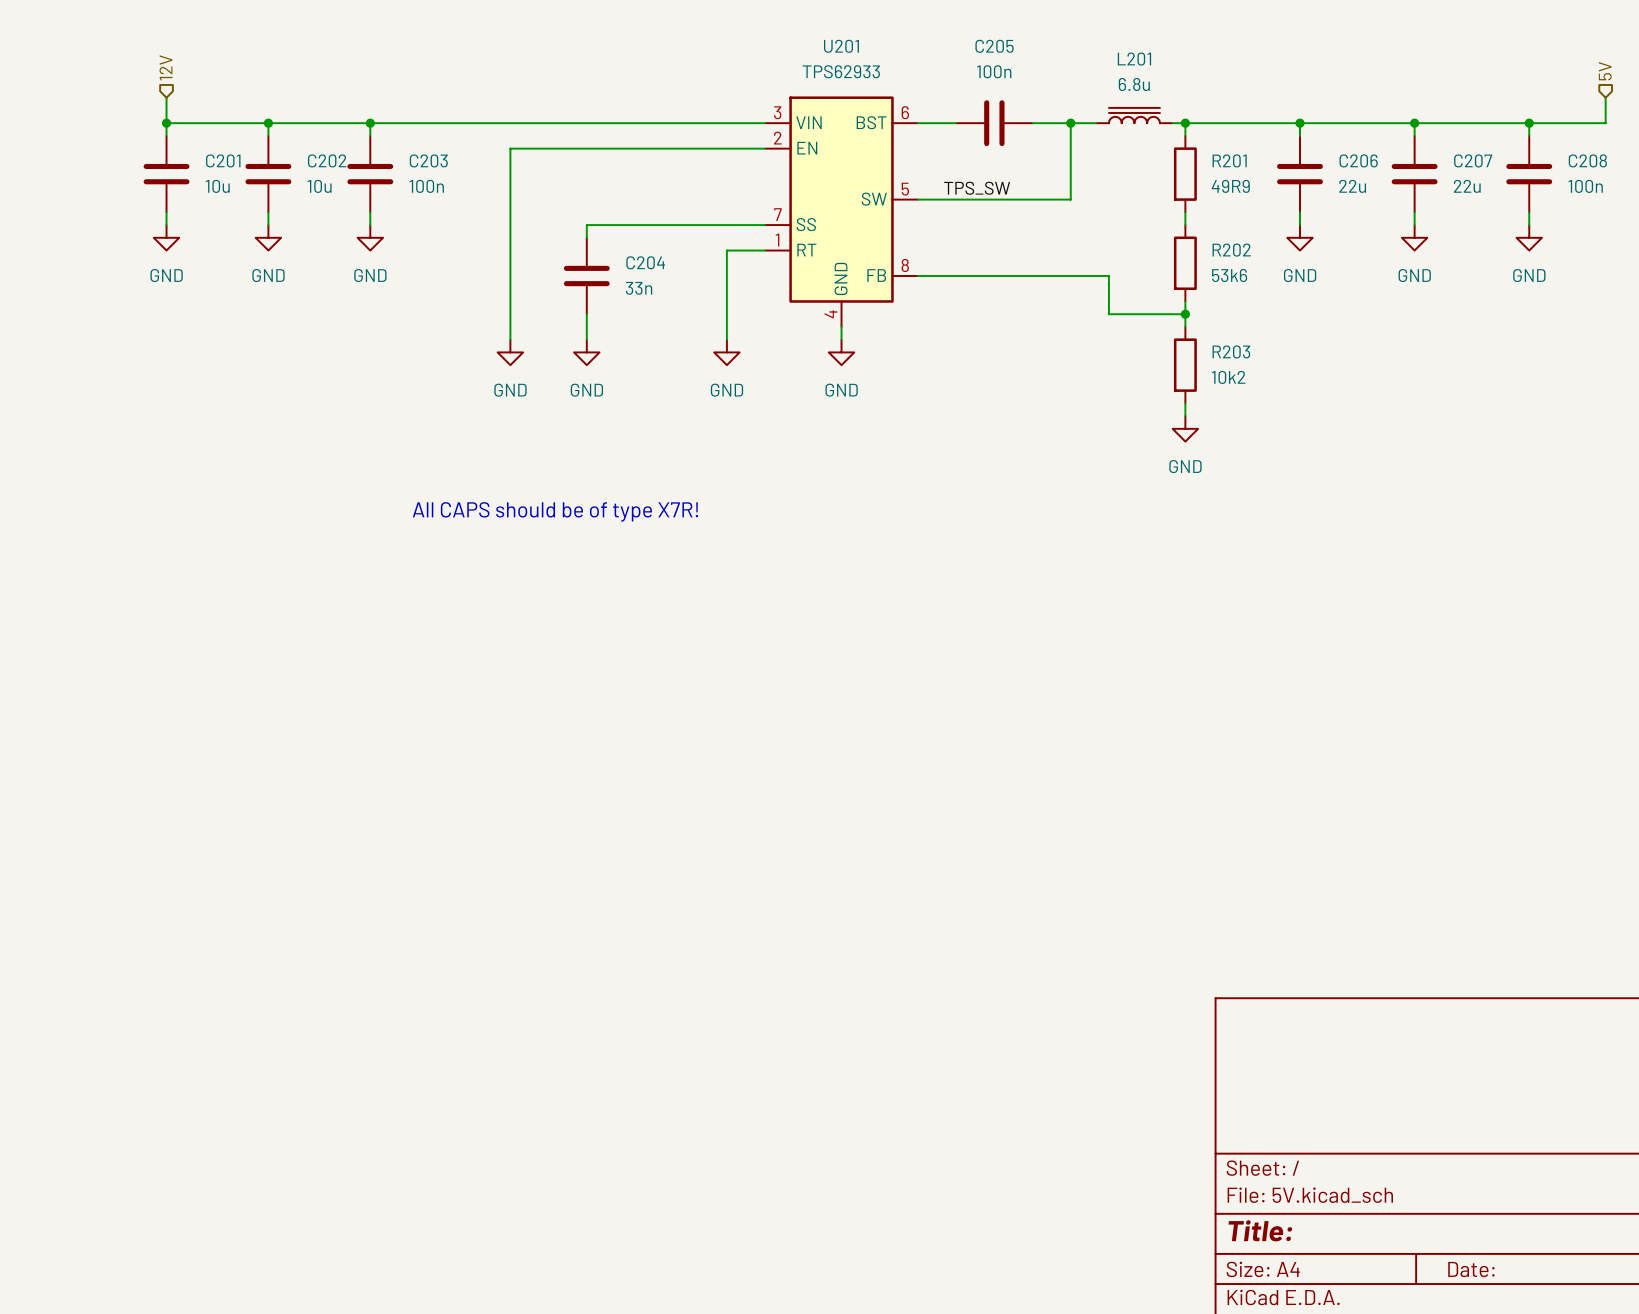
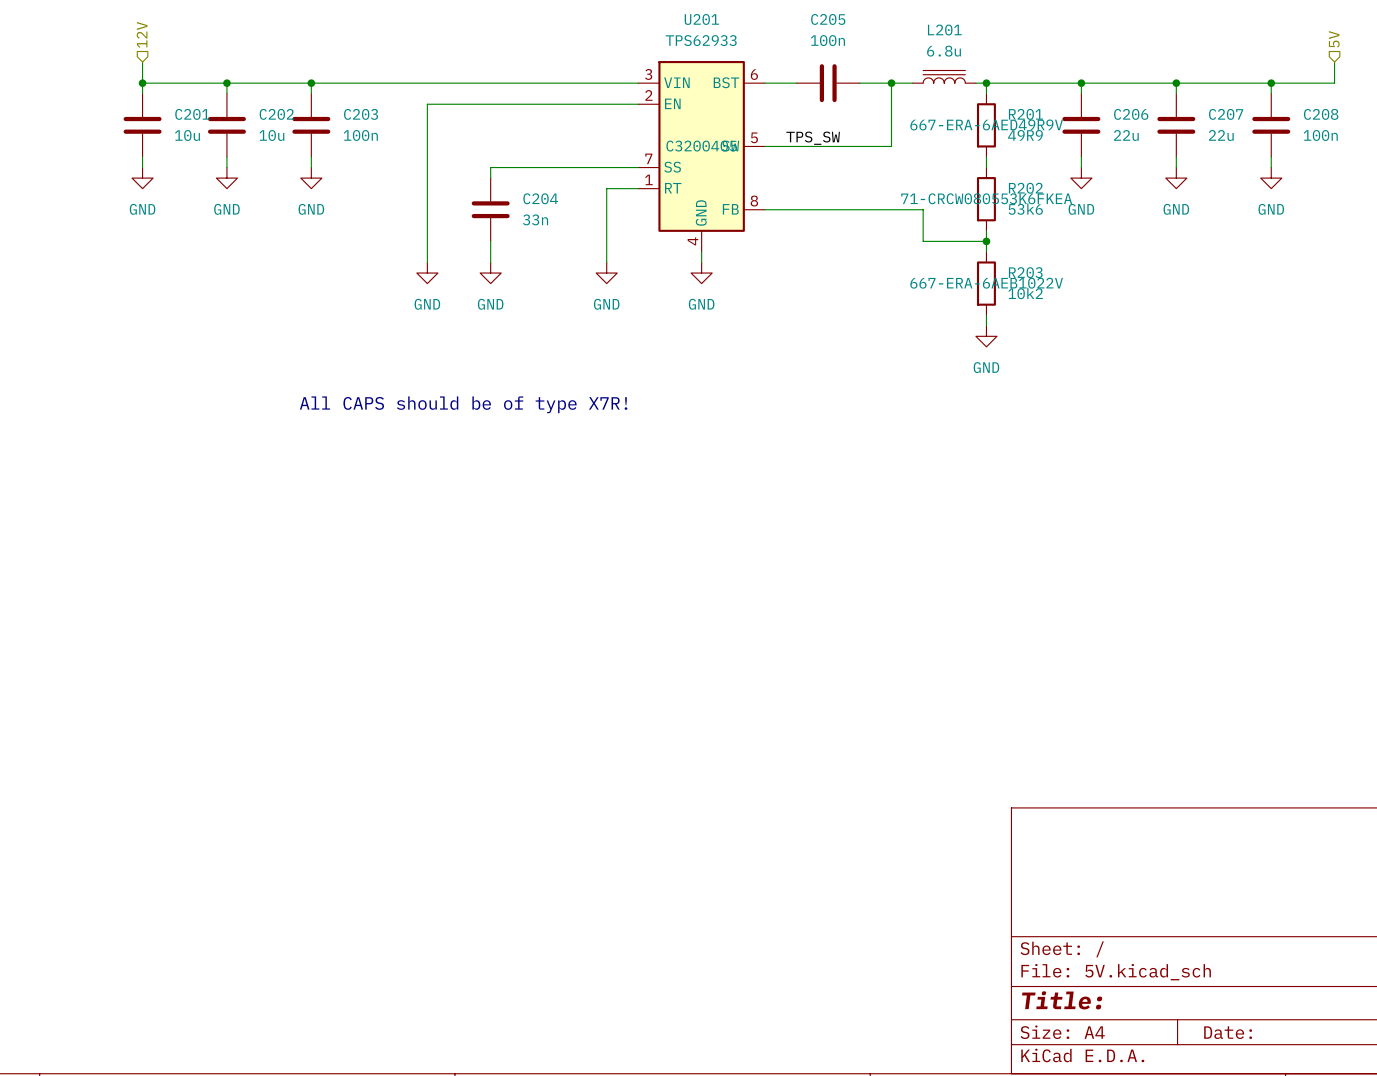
R201 text: none -> 667-ERA-6AED49R9V (986, 124)
U201 text: none -> C3200405 (701, 146)
R202 text: none -> 71-CRCW080553K6FKEA (986, 198)
R203 text: none -> 667-ERA-6AEB1022V (986, 283)

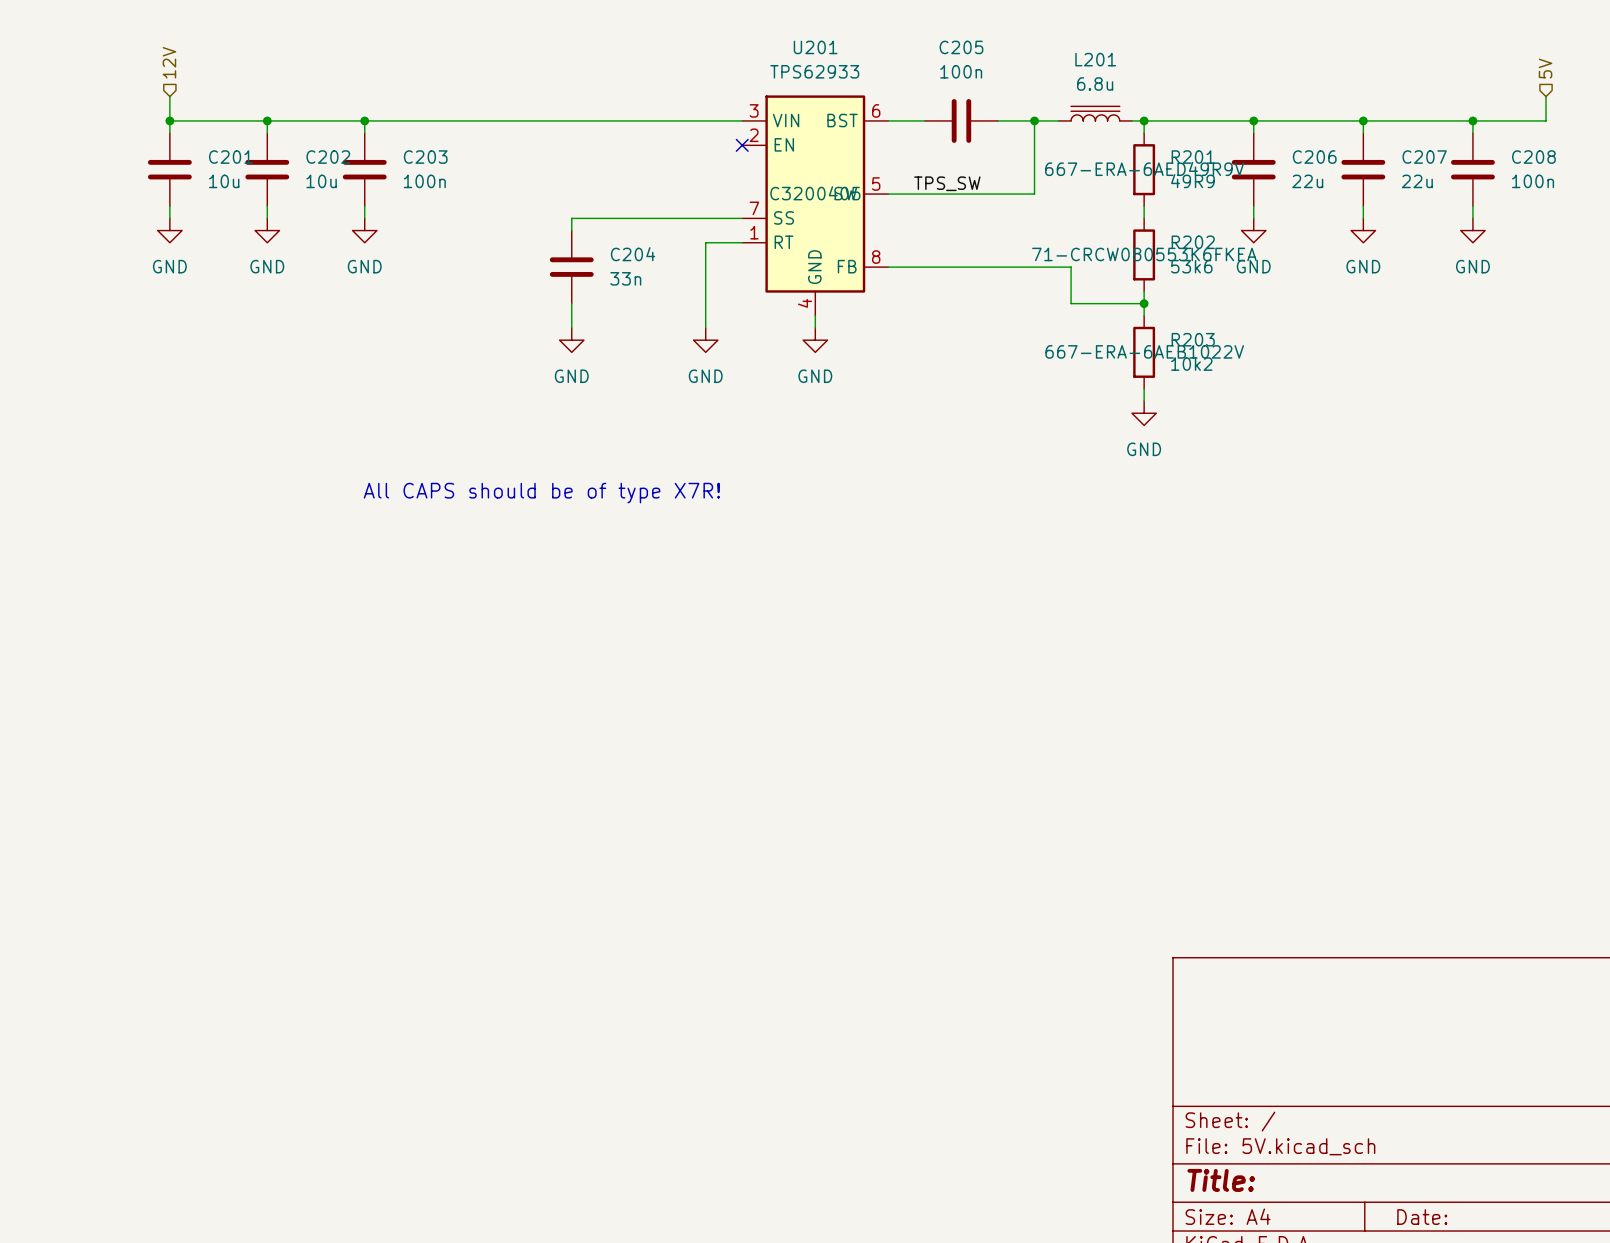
wire: (638, 104) (427, 104) (427, 262) -> none
no-connect mark: none -> (742, 145)
power symbol: GND (427, 273) -> none

